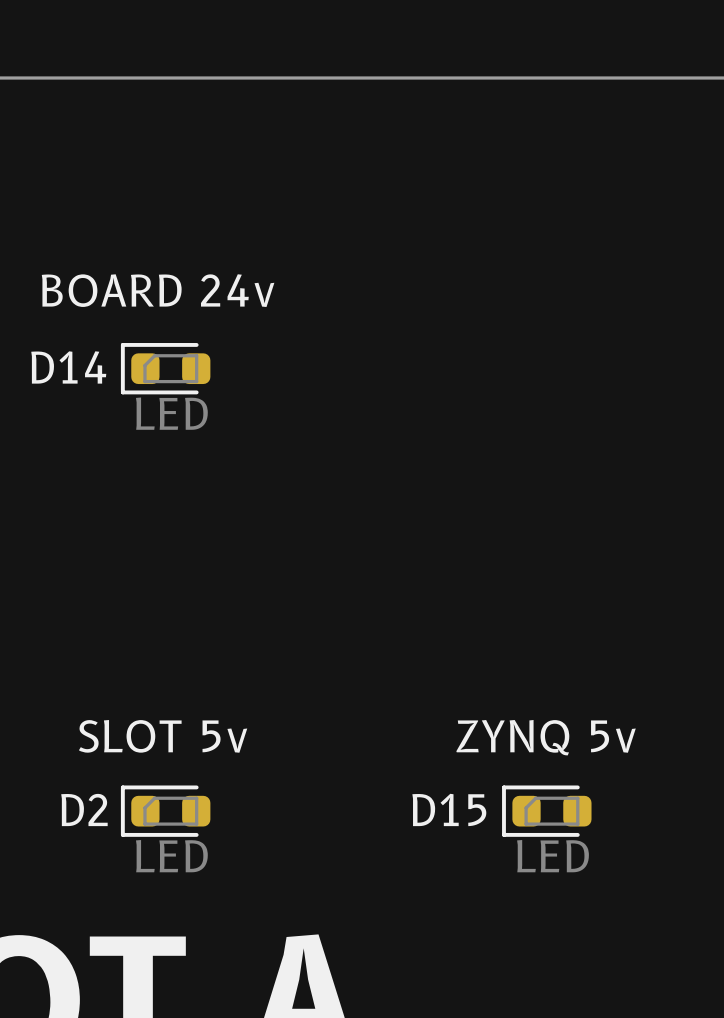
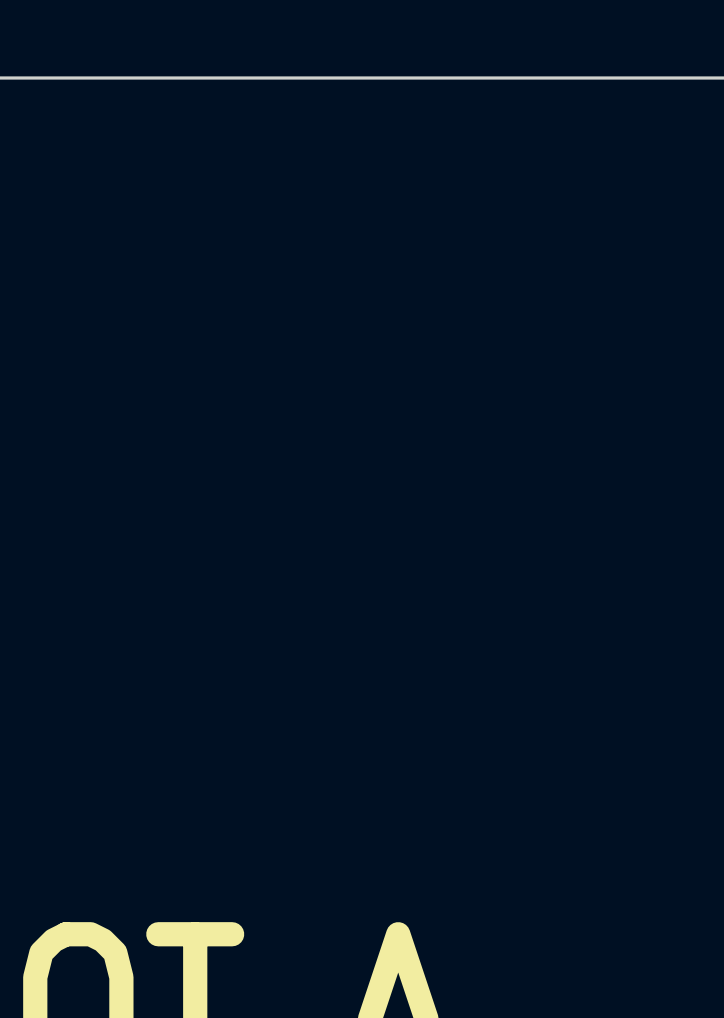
text: BOARD 24v (158, 290) -> none
D14: LED (165, 368) -> none
text: SLOT 5v (163, 736) -> none
text: ZYNQ 5v (546, 737) -> none
D2: LED (165, 811) -> none
D15: LED (546, 811) -> none

